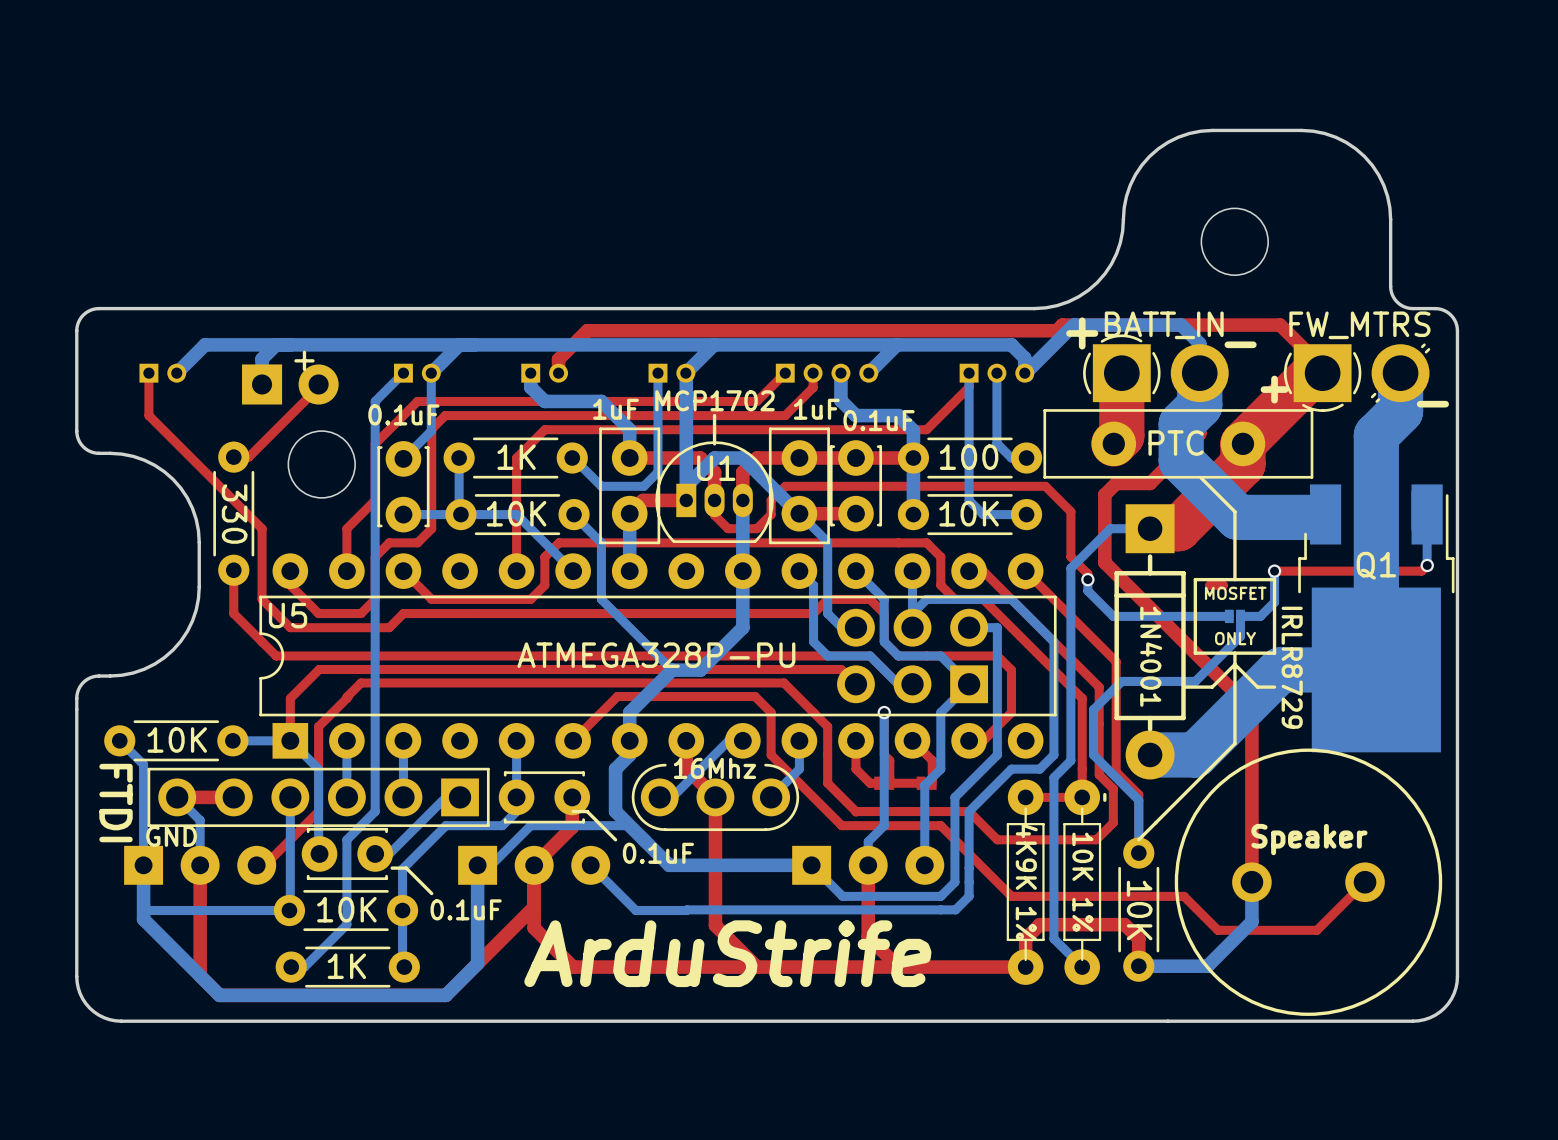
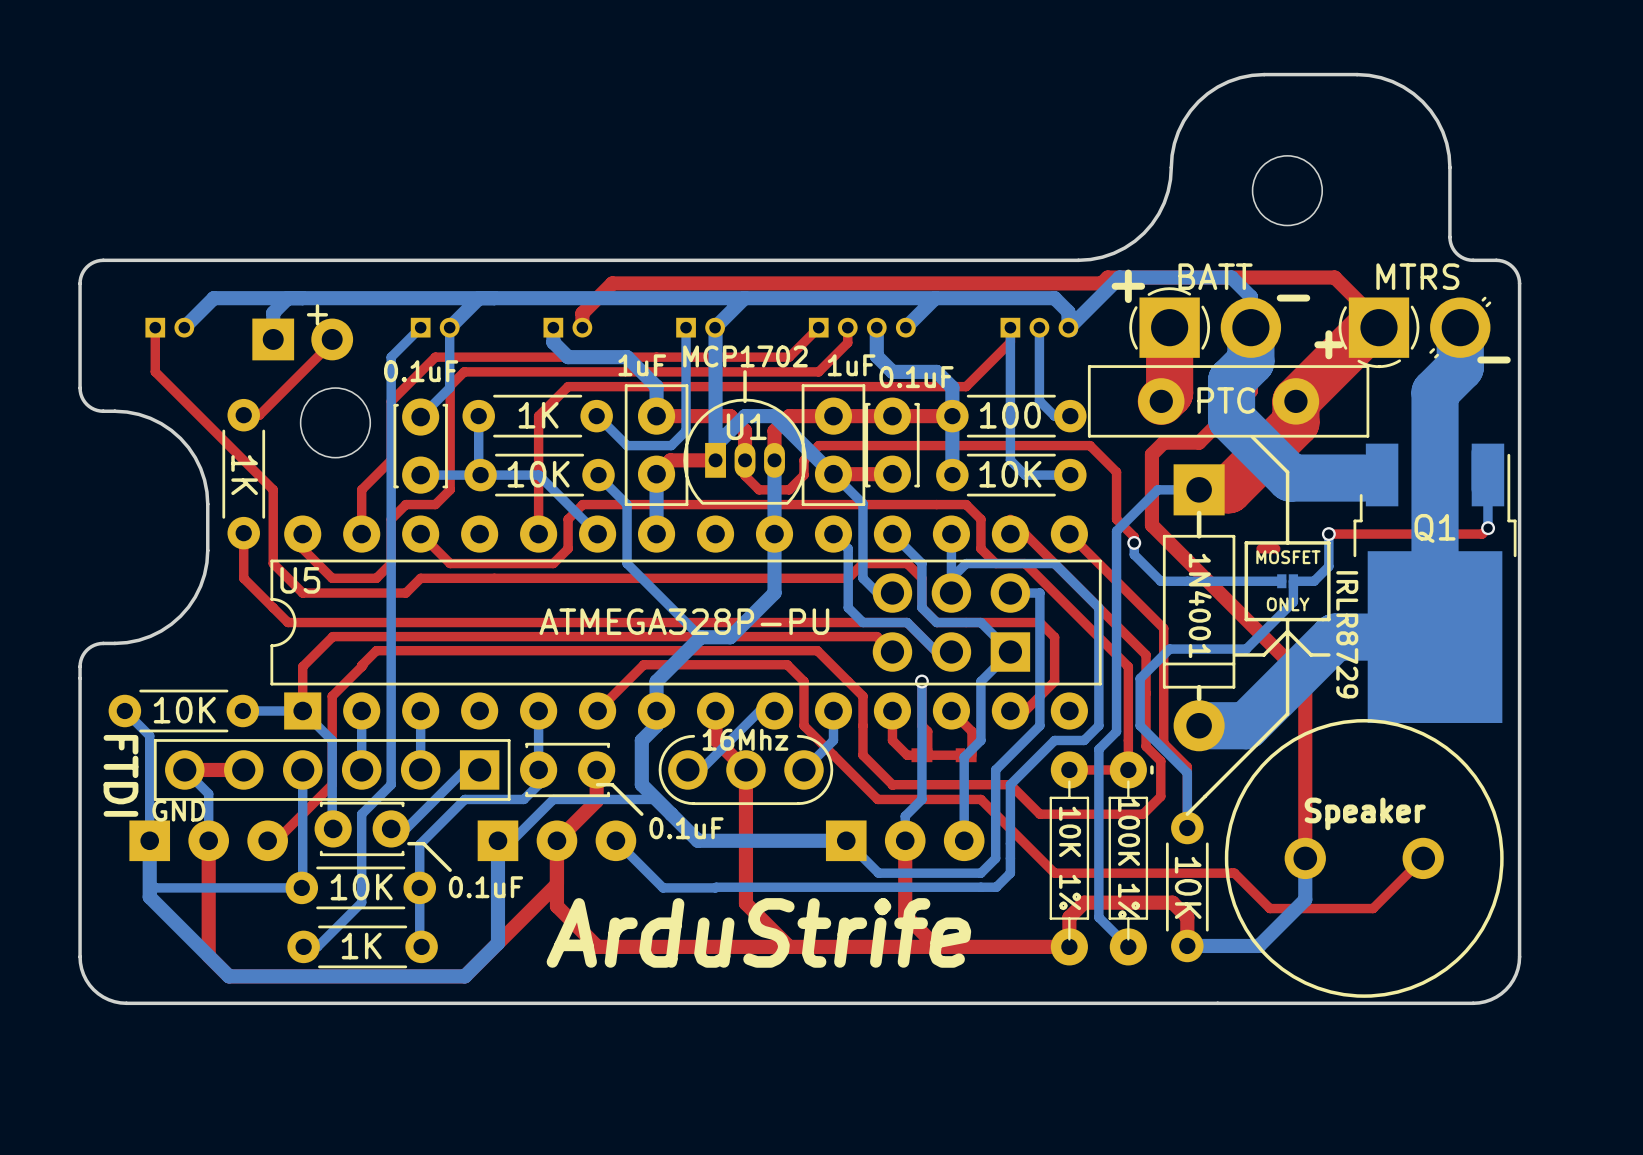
part value: BATT_IN (1164, 325) -> BATT (1215, 276)
part value: FW_MTRS (1359, 325) -> MTRS (1417, 276)
part footprint: [1114, 504, 1186, 780] -> [1162, 464, 1236, 752]
part value: 330 (234, 514) -> 1K (244, 475)
part value: 4K9K 1% (1026, 882) -> 10K 1% (1070, 858)
part value: 10K 1% (1082, 882) -> 100K 1% (1129, 858)

